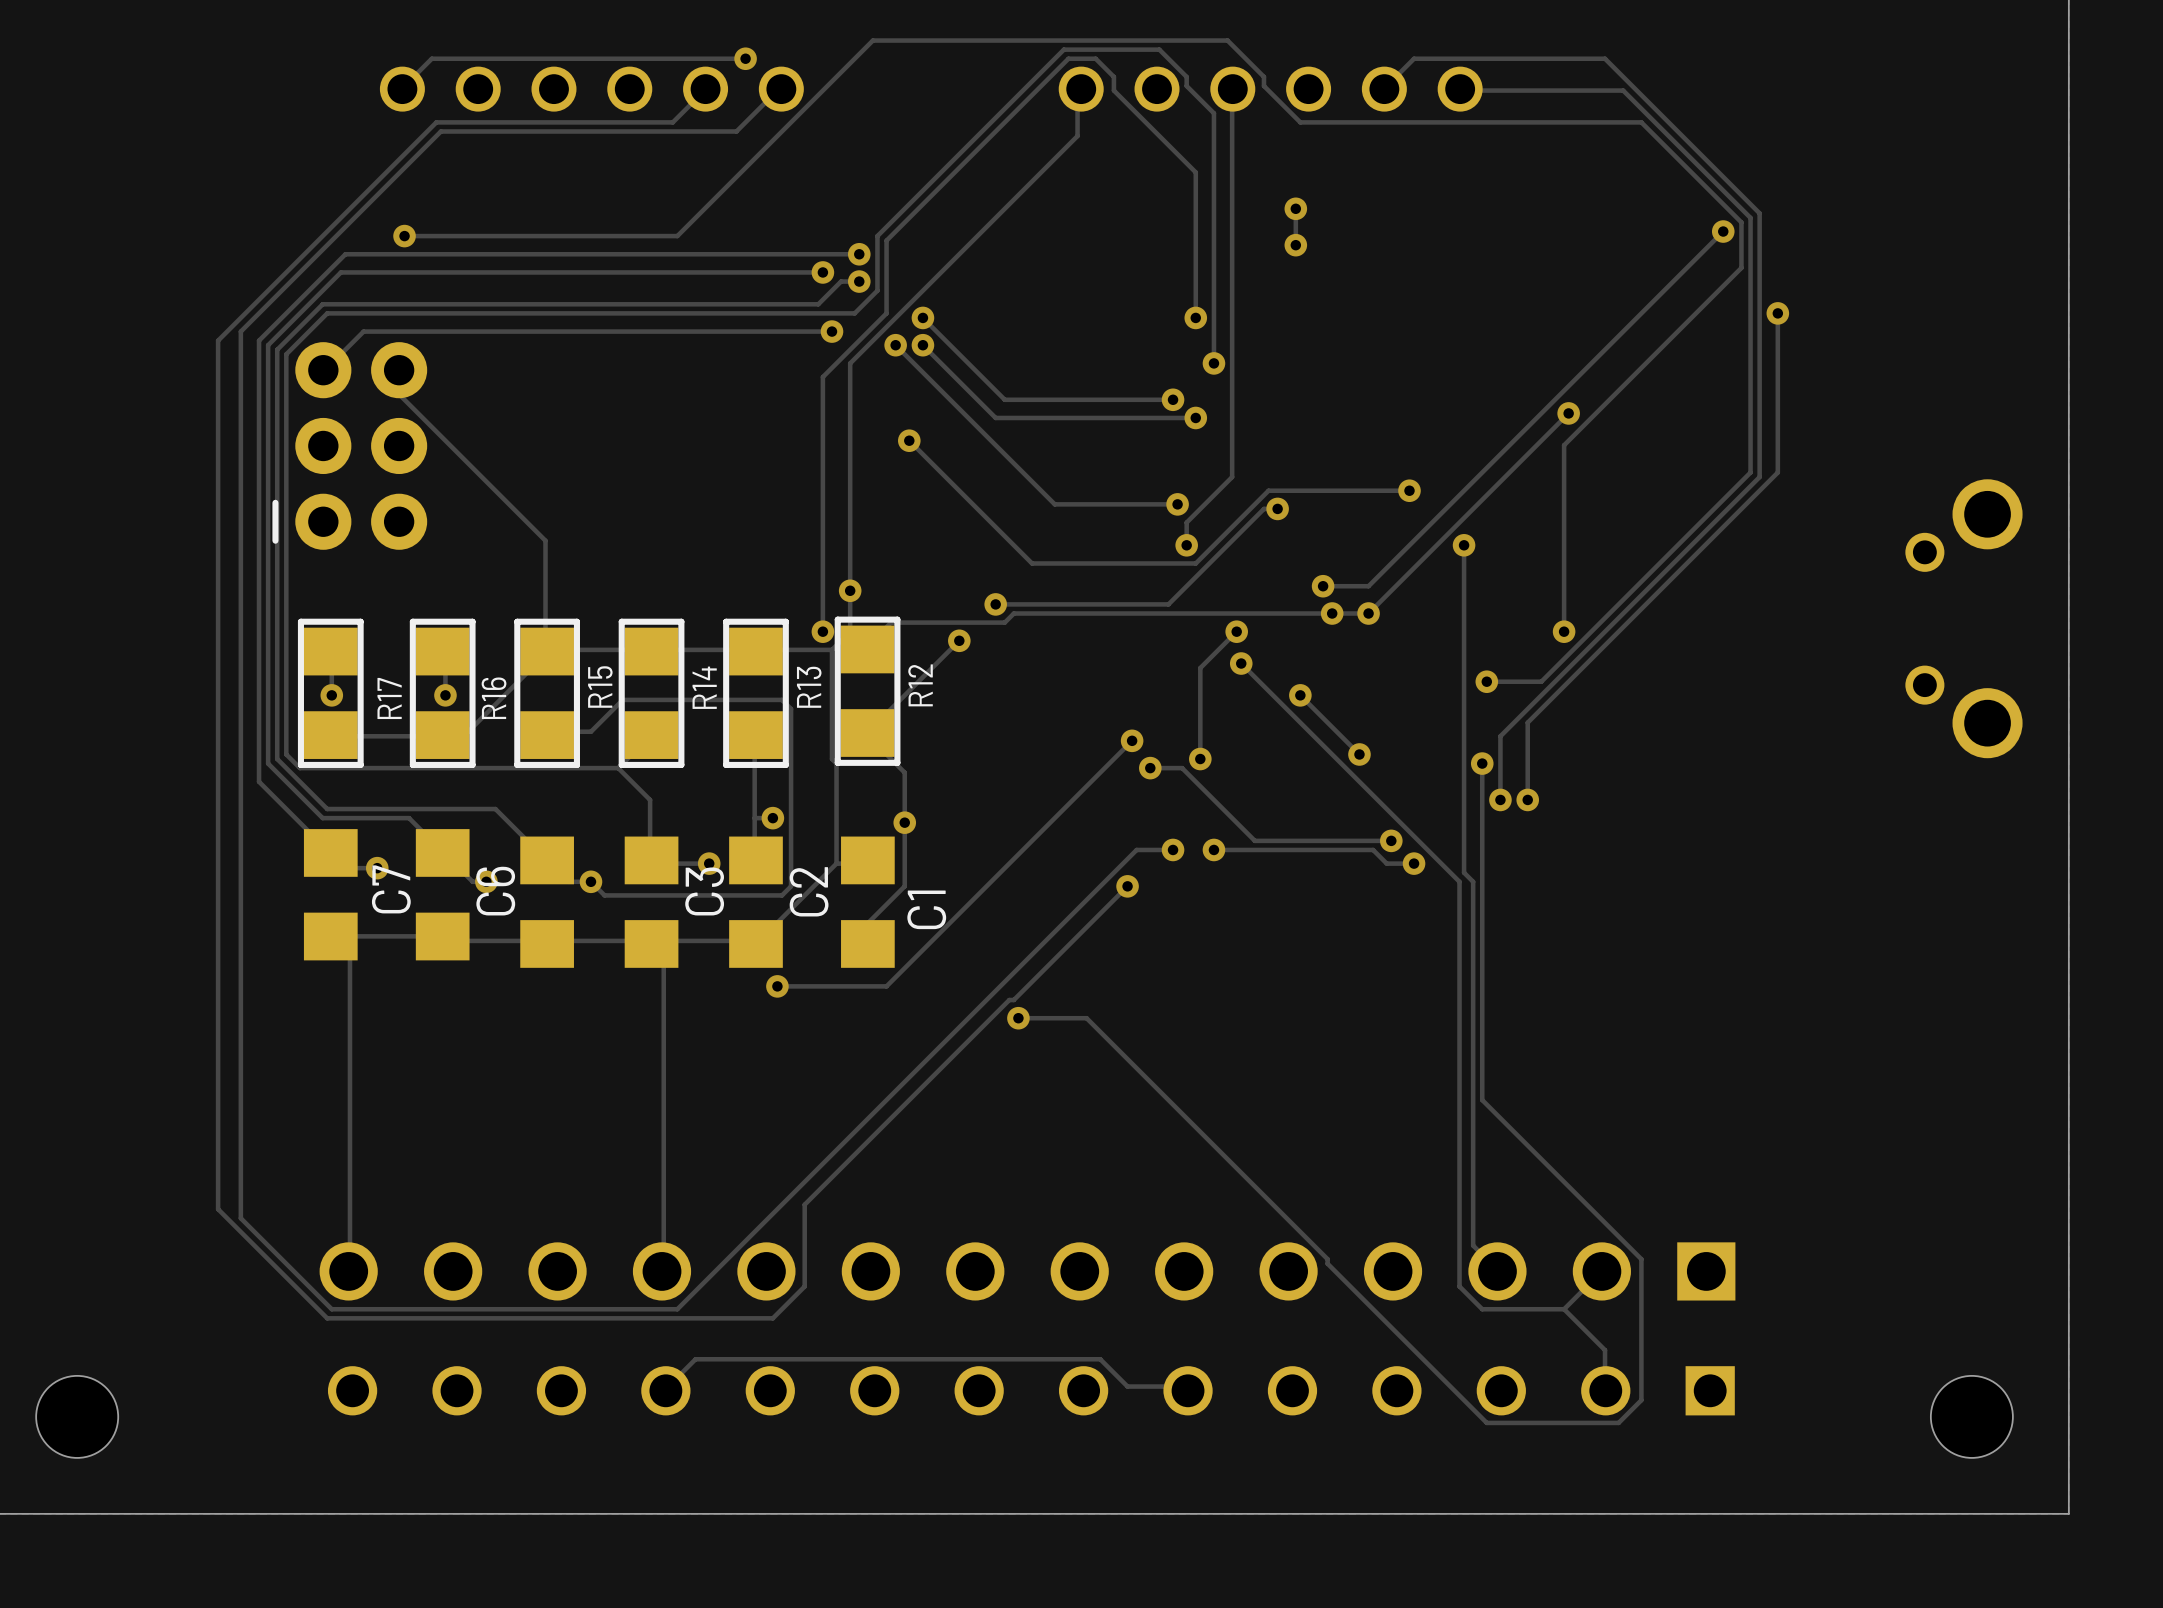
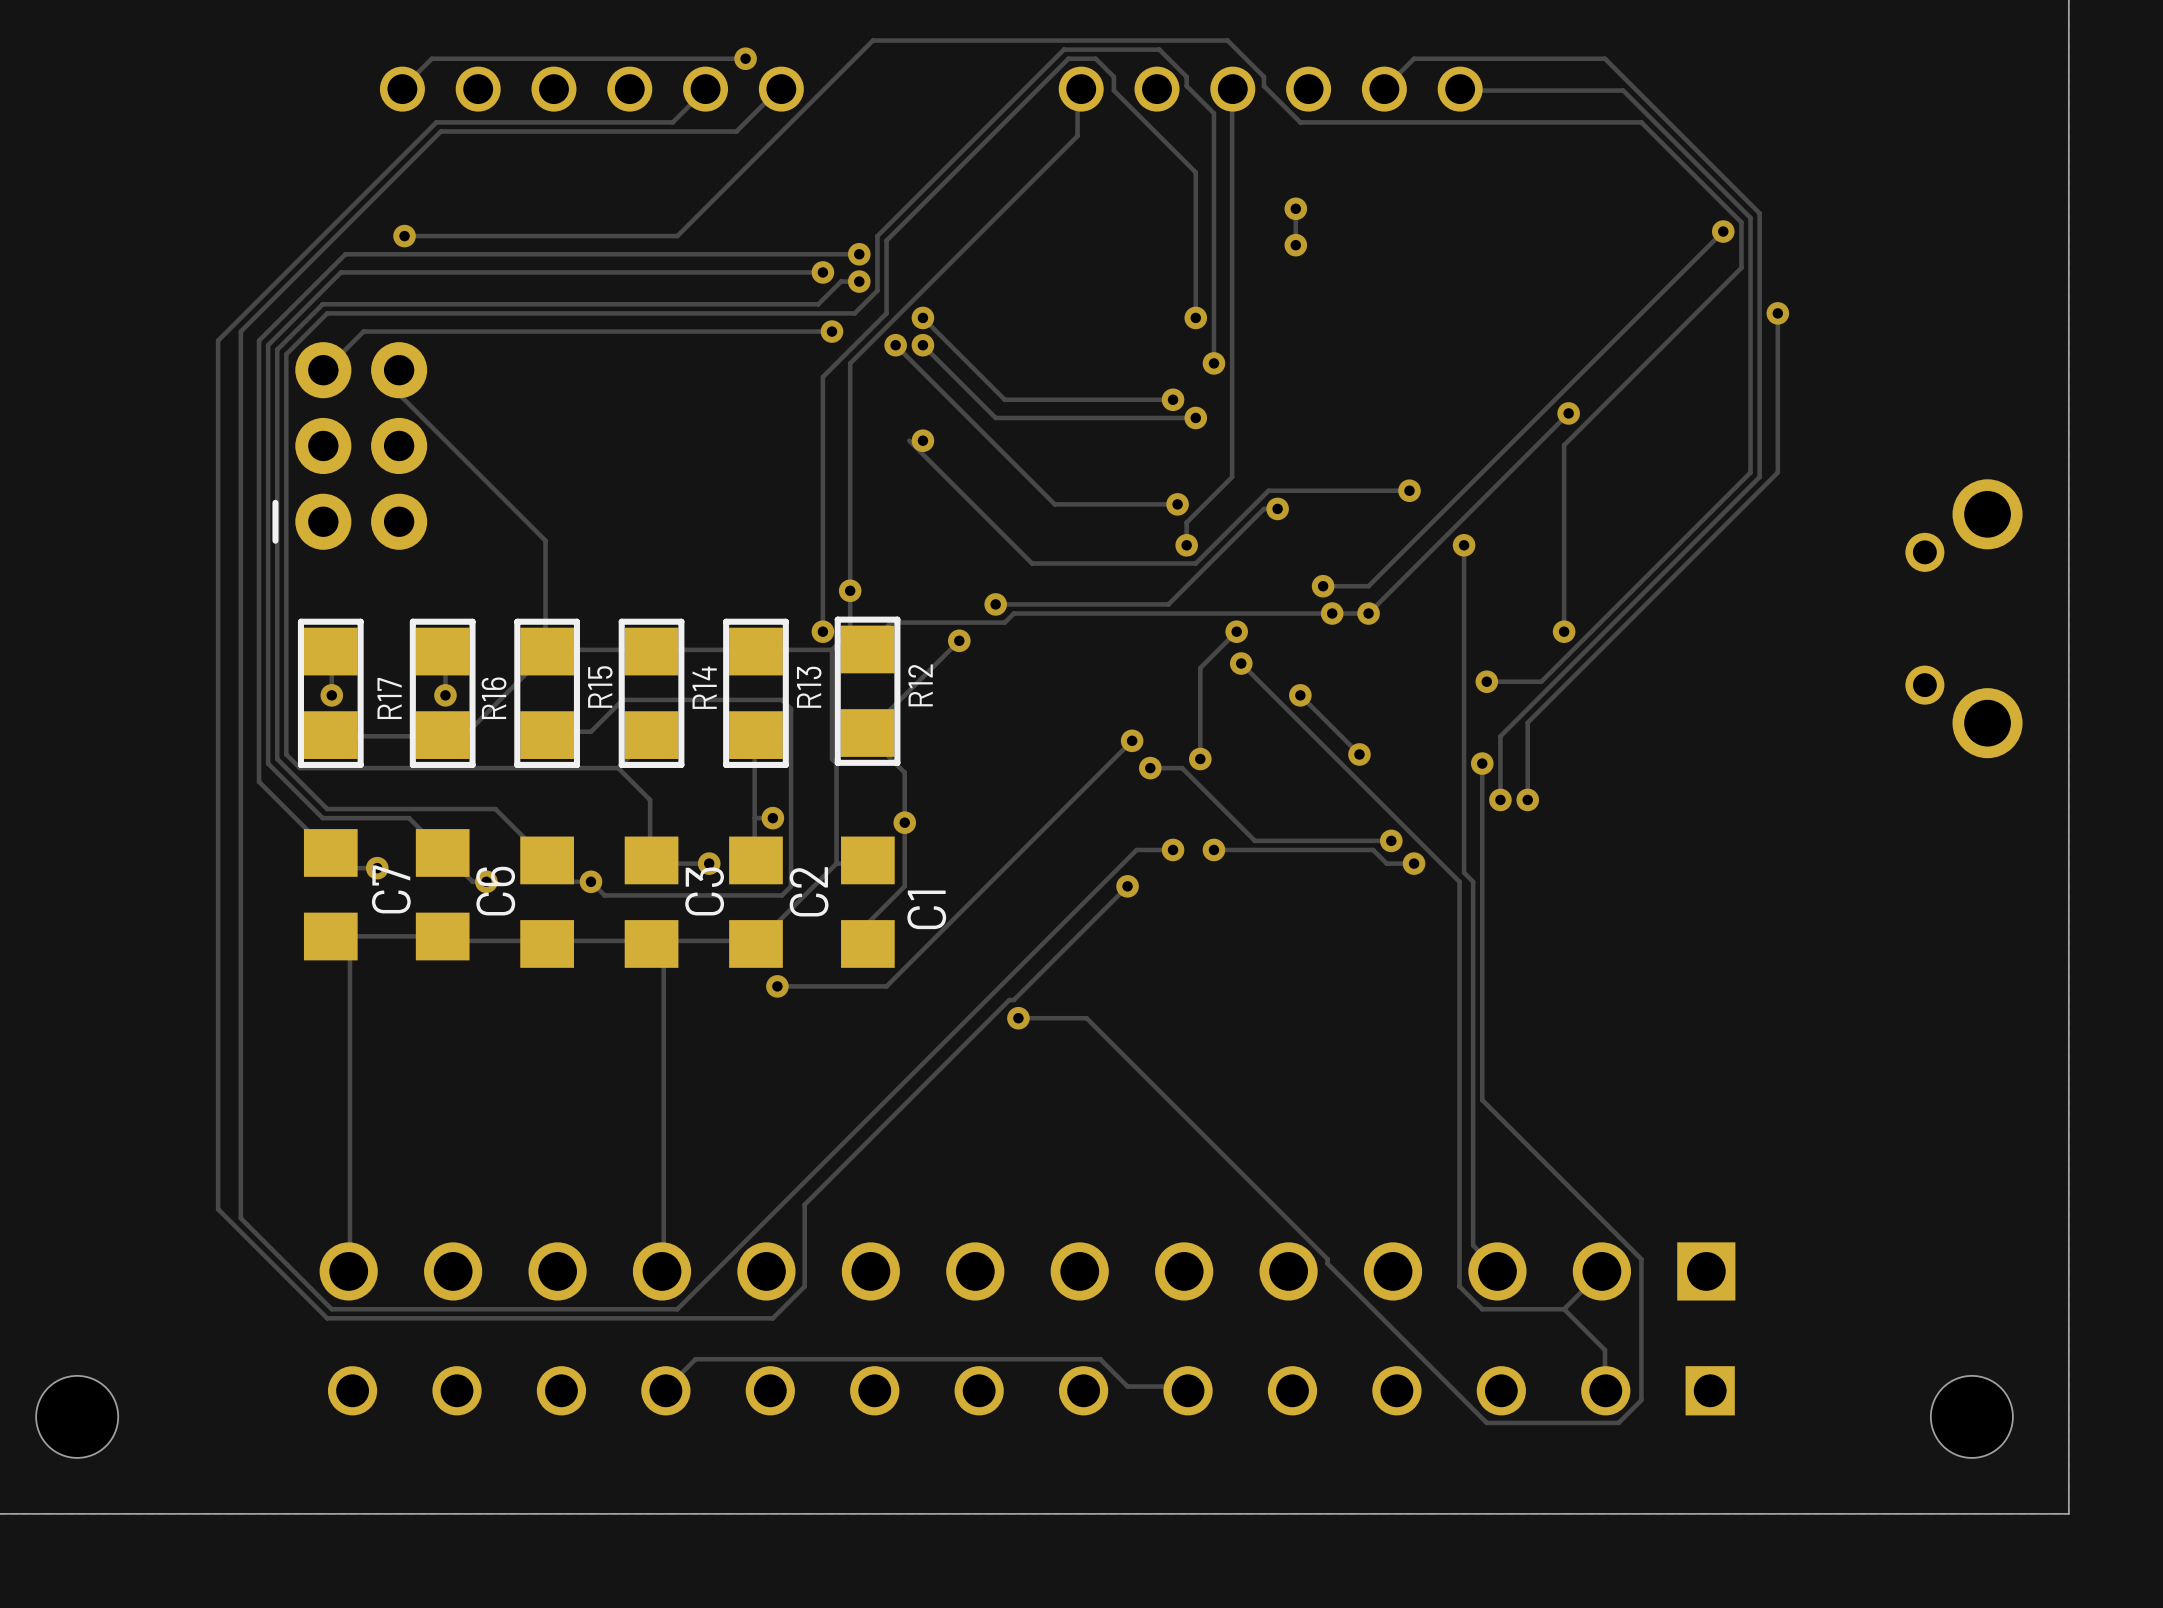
via position: (909, 440) -> (922, 440)

